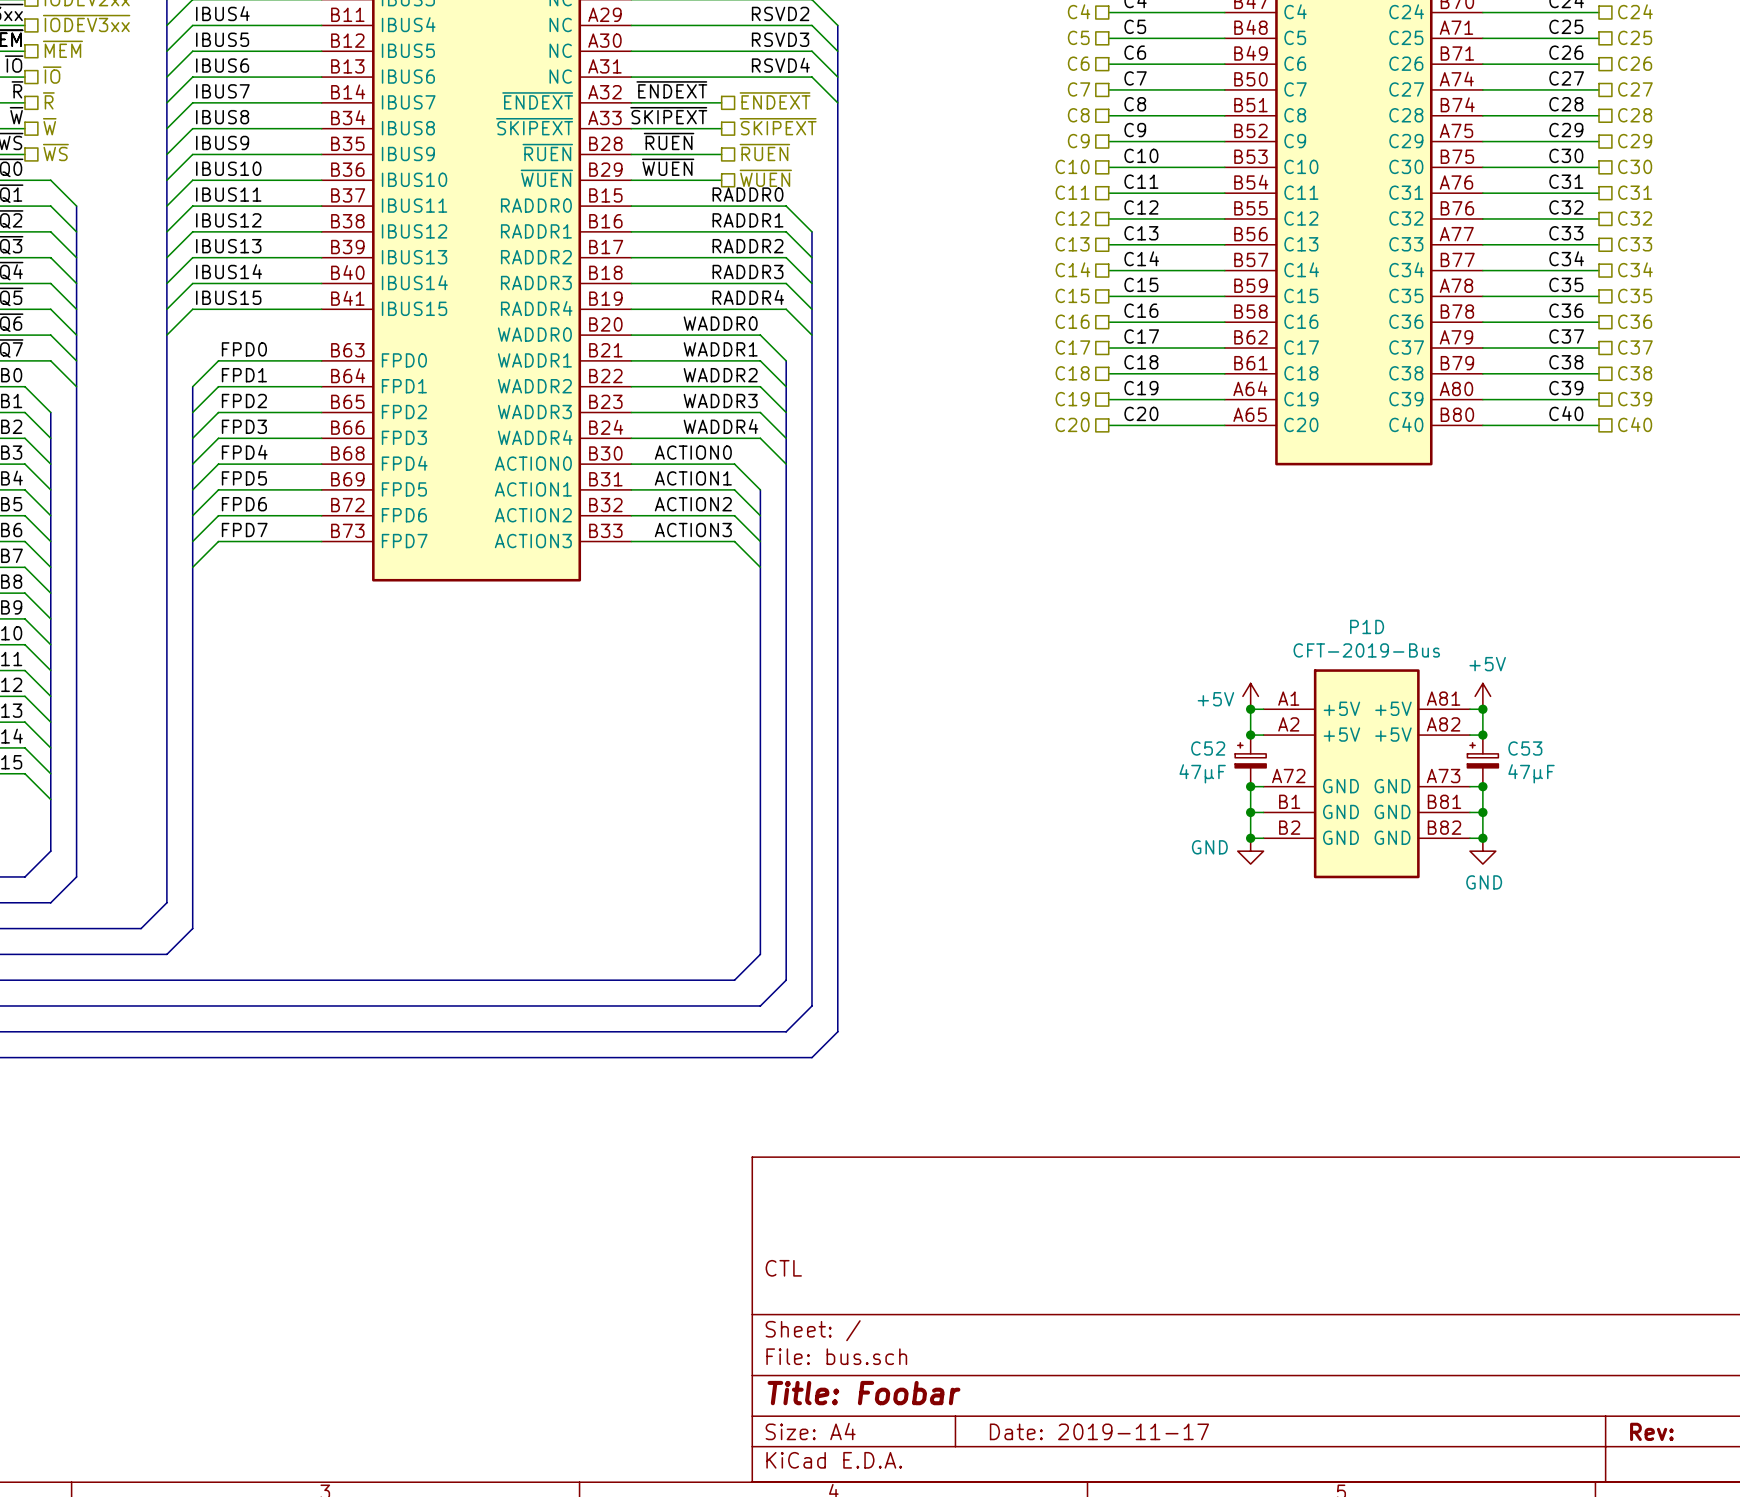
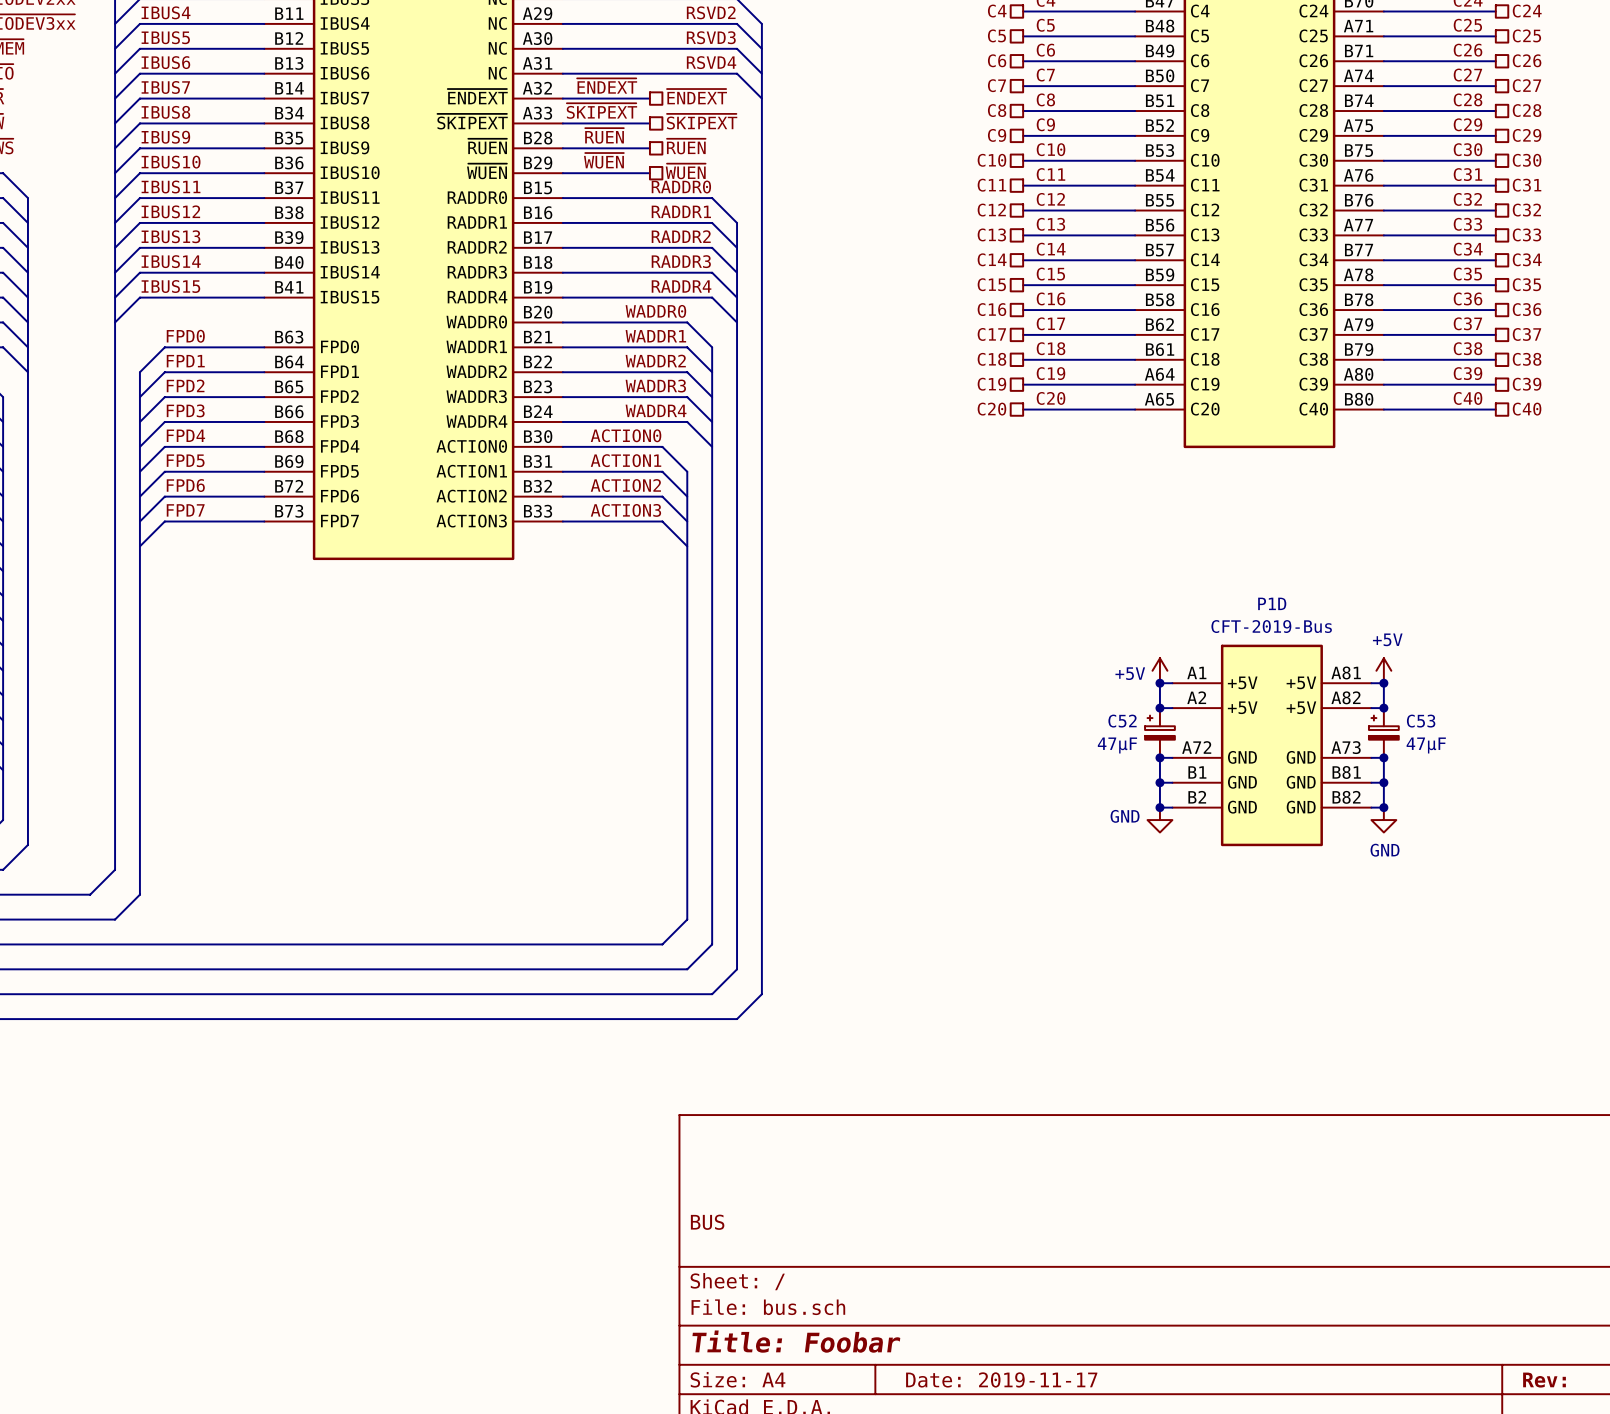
title block: CTL (783, 1268) -> BUS (707, 1222)

